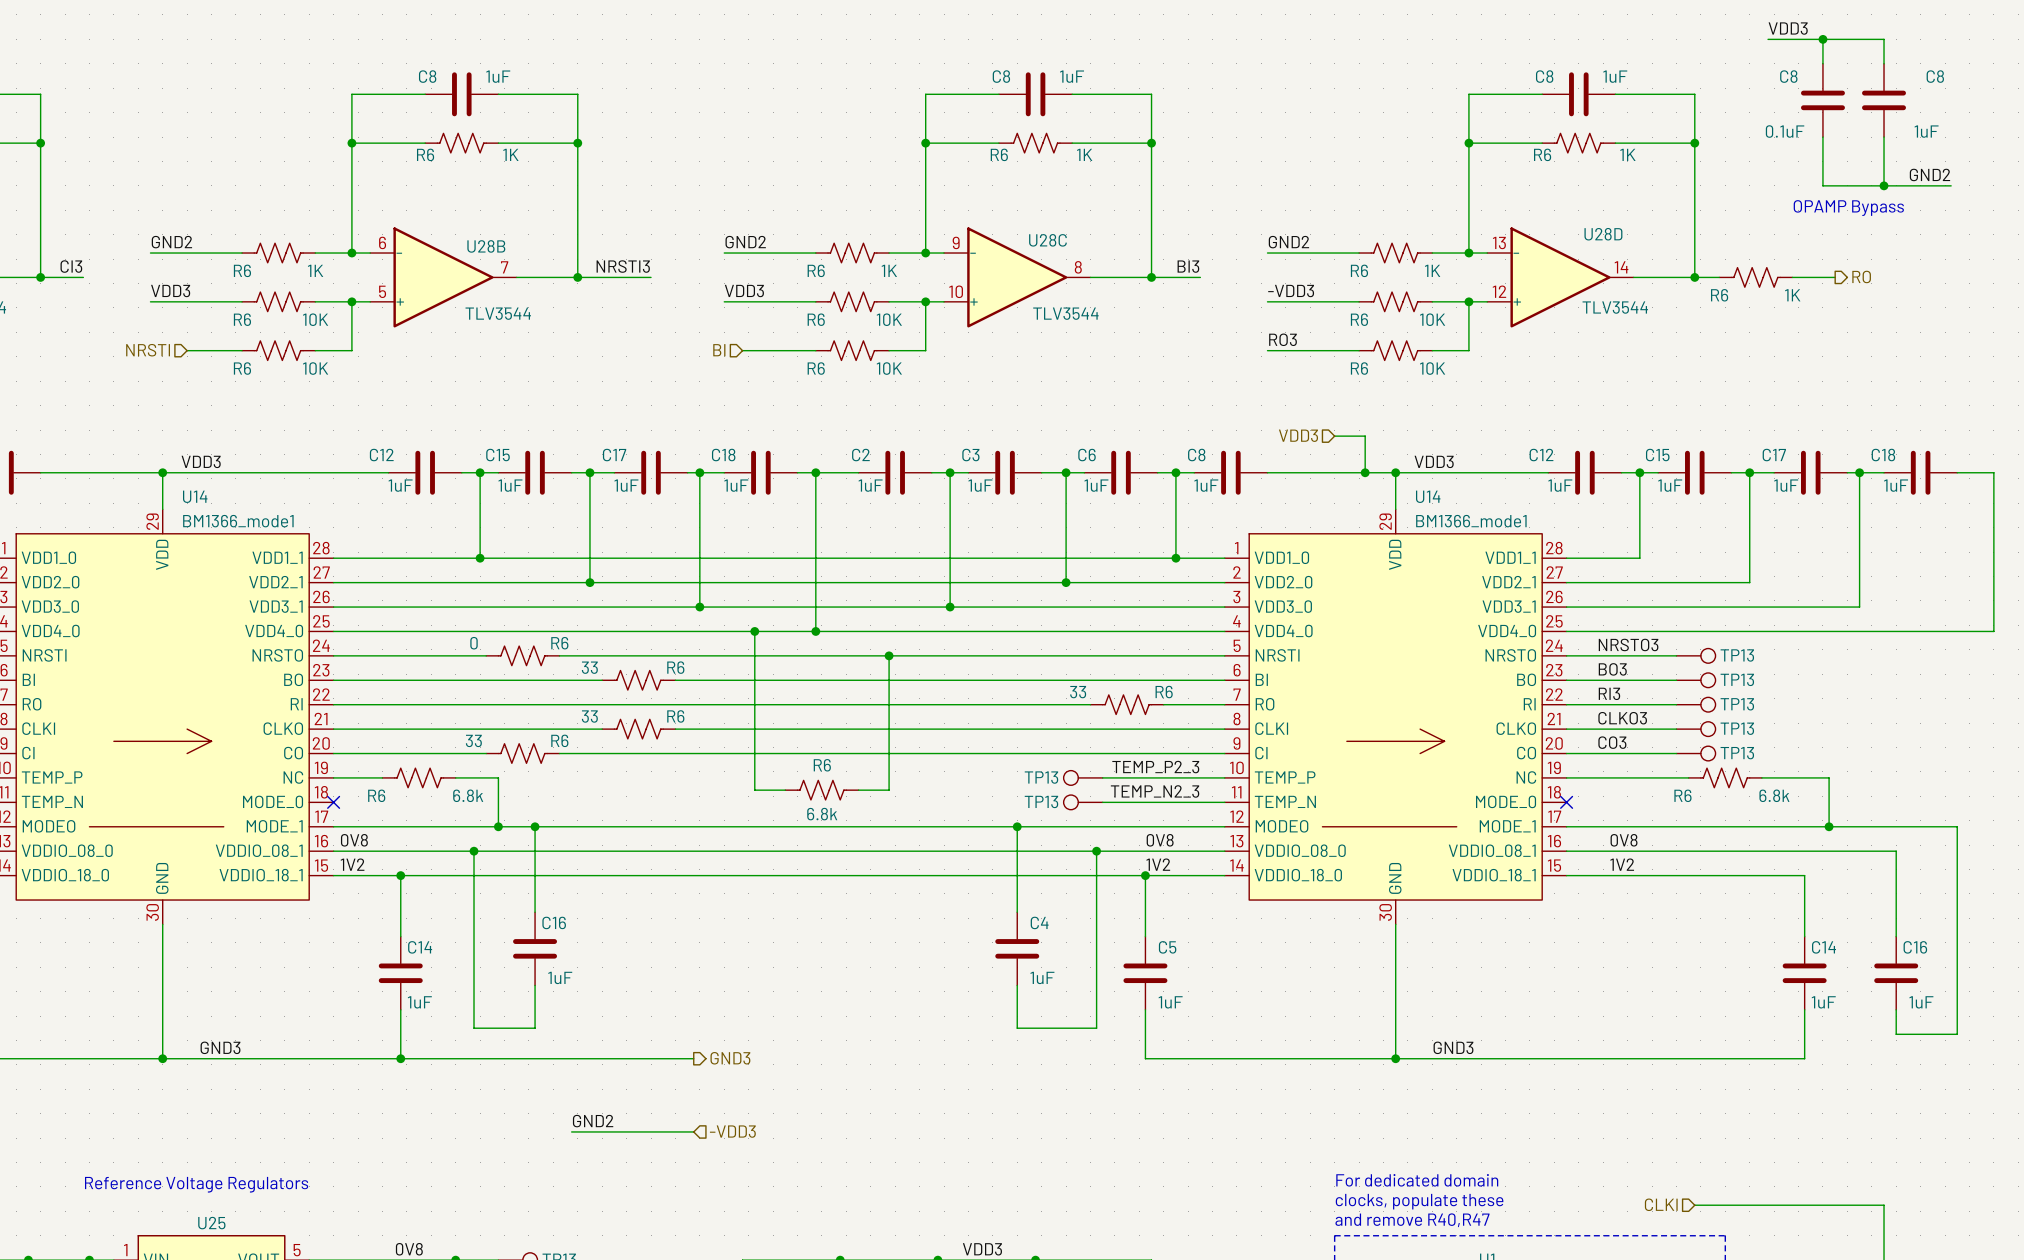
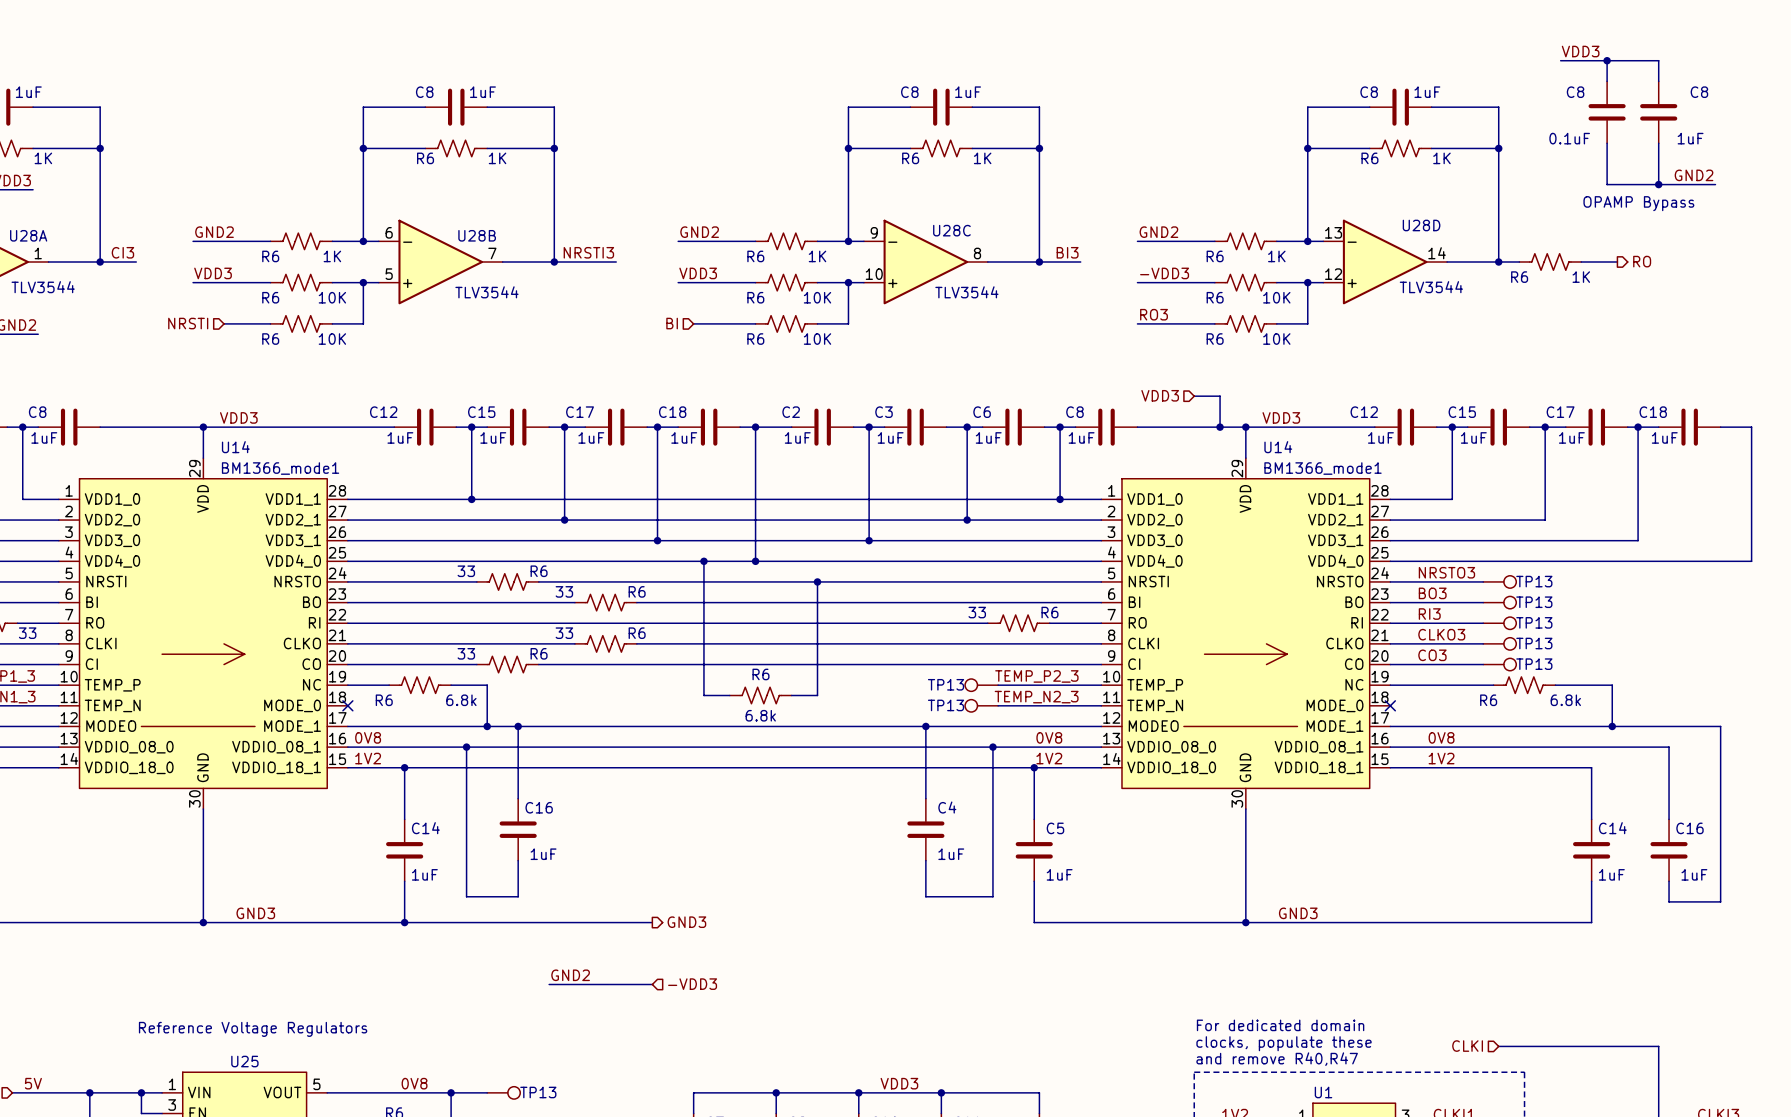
R6 value: 0 (474, 643) -> 33 (466, 571)

